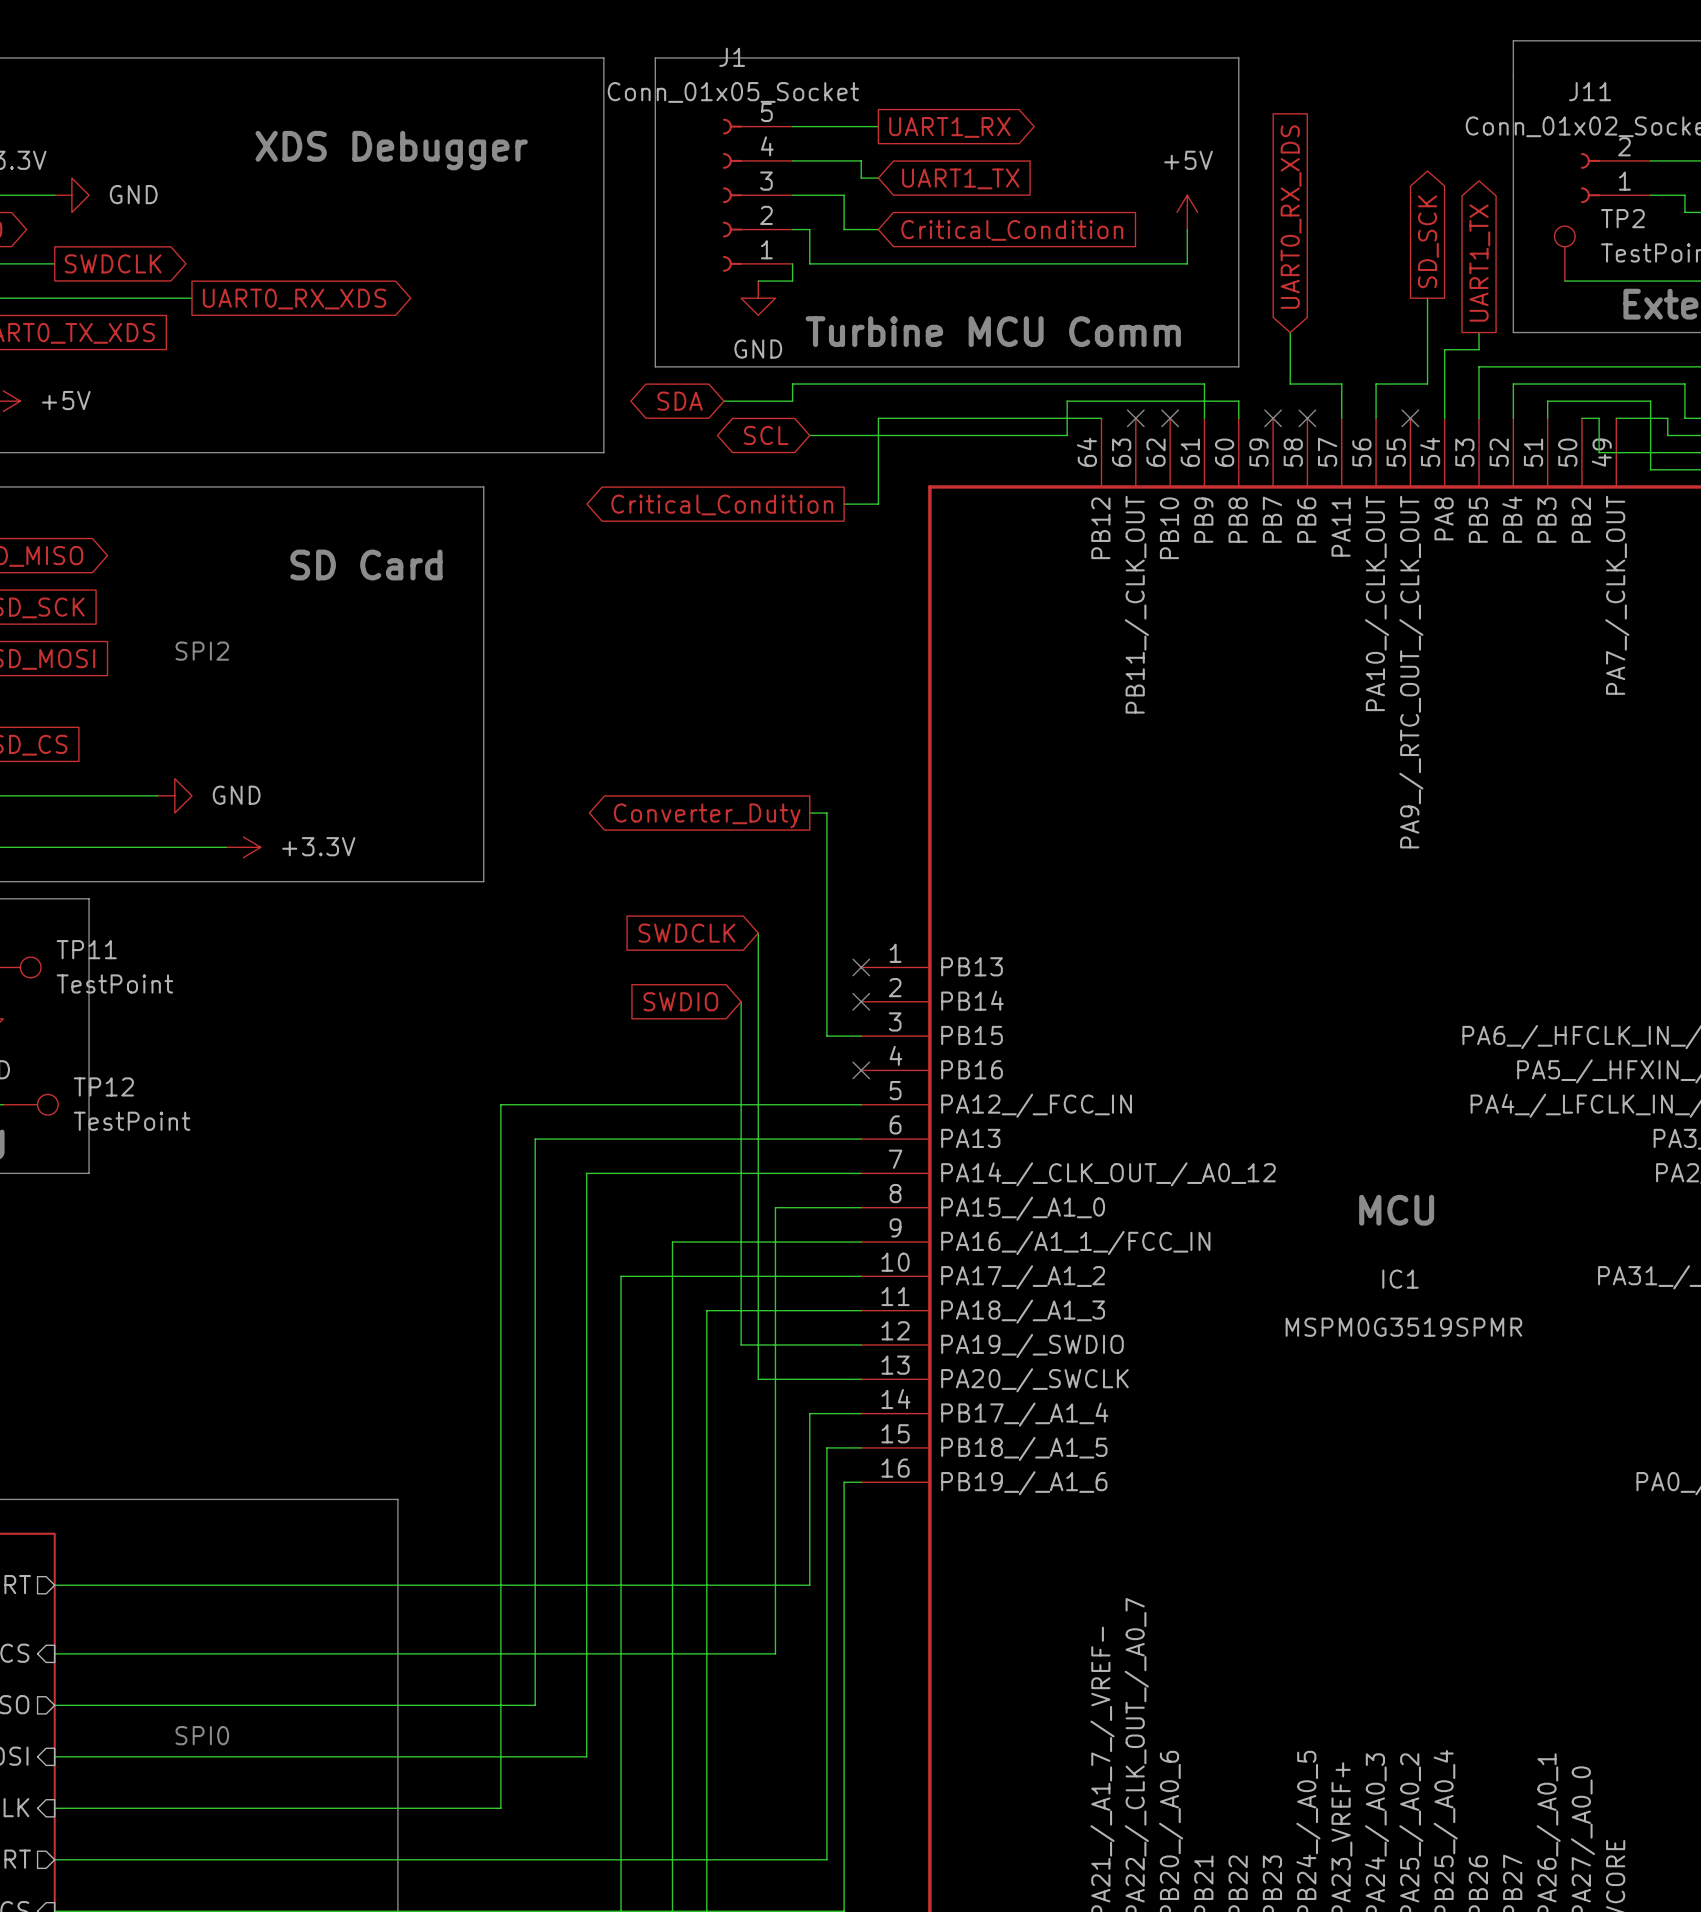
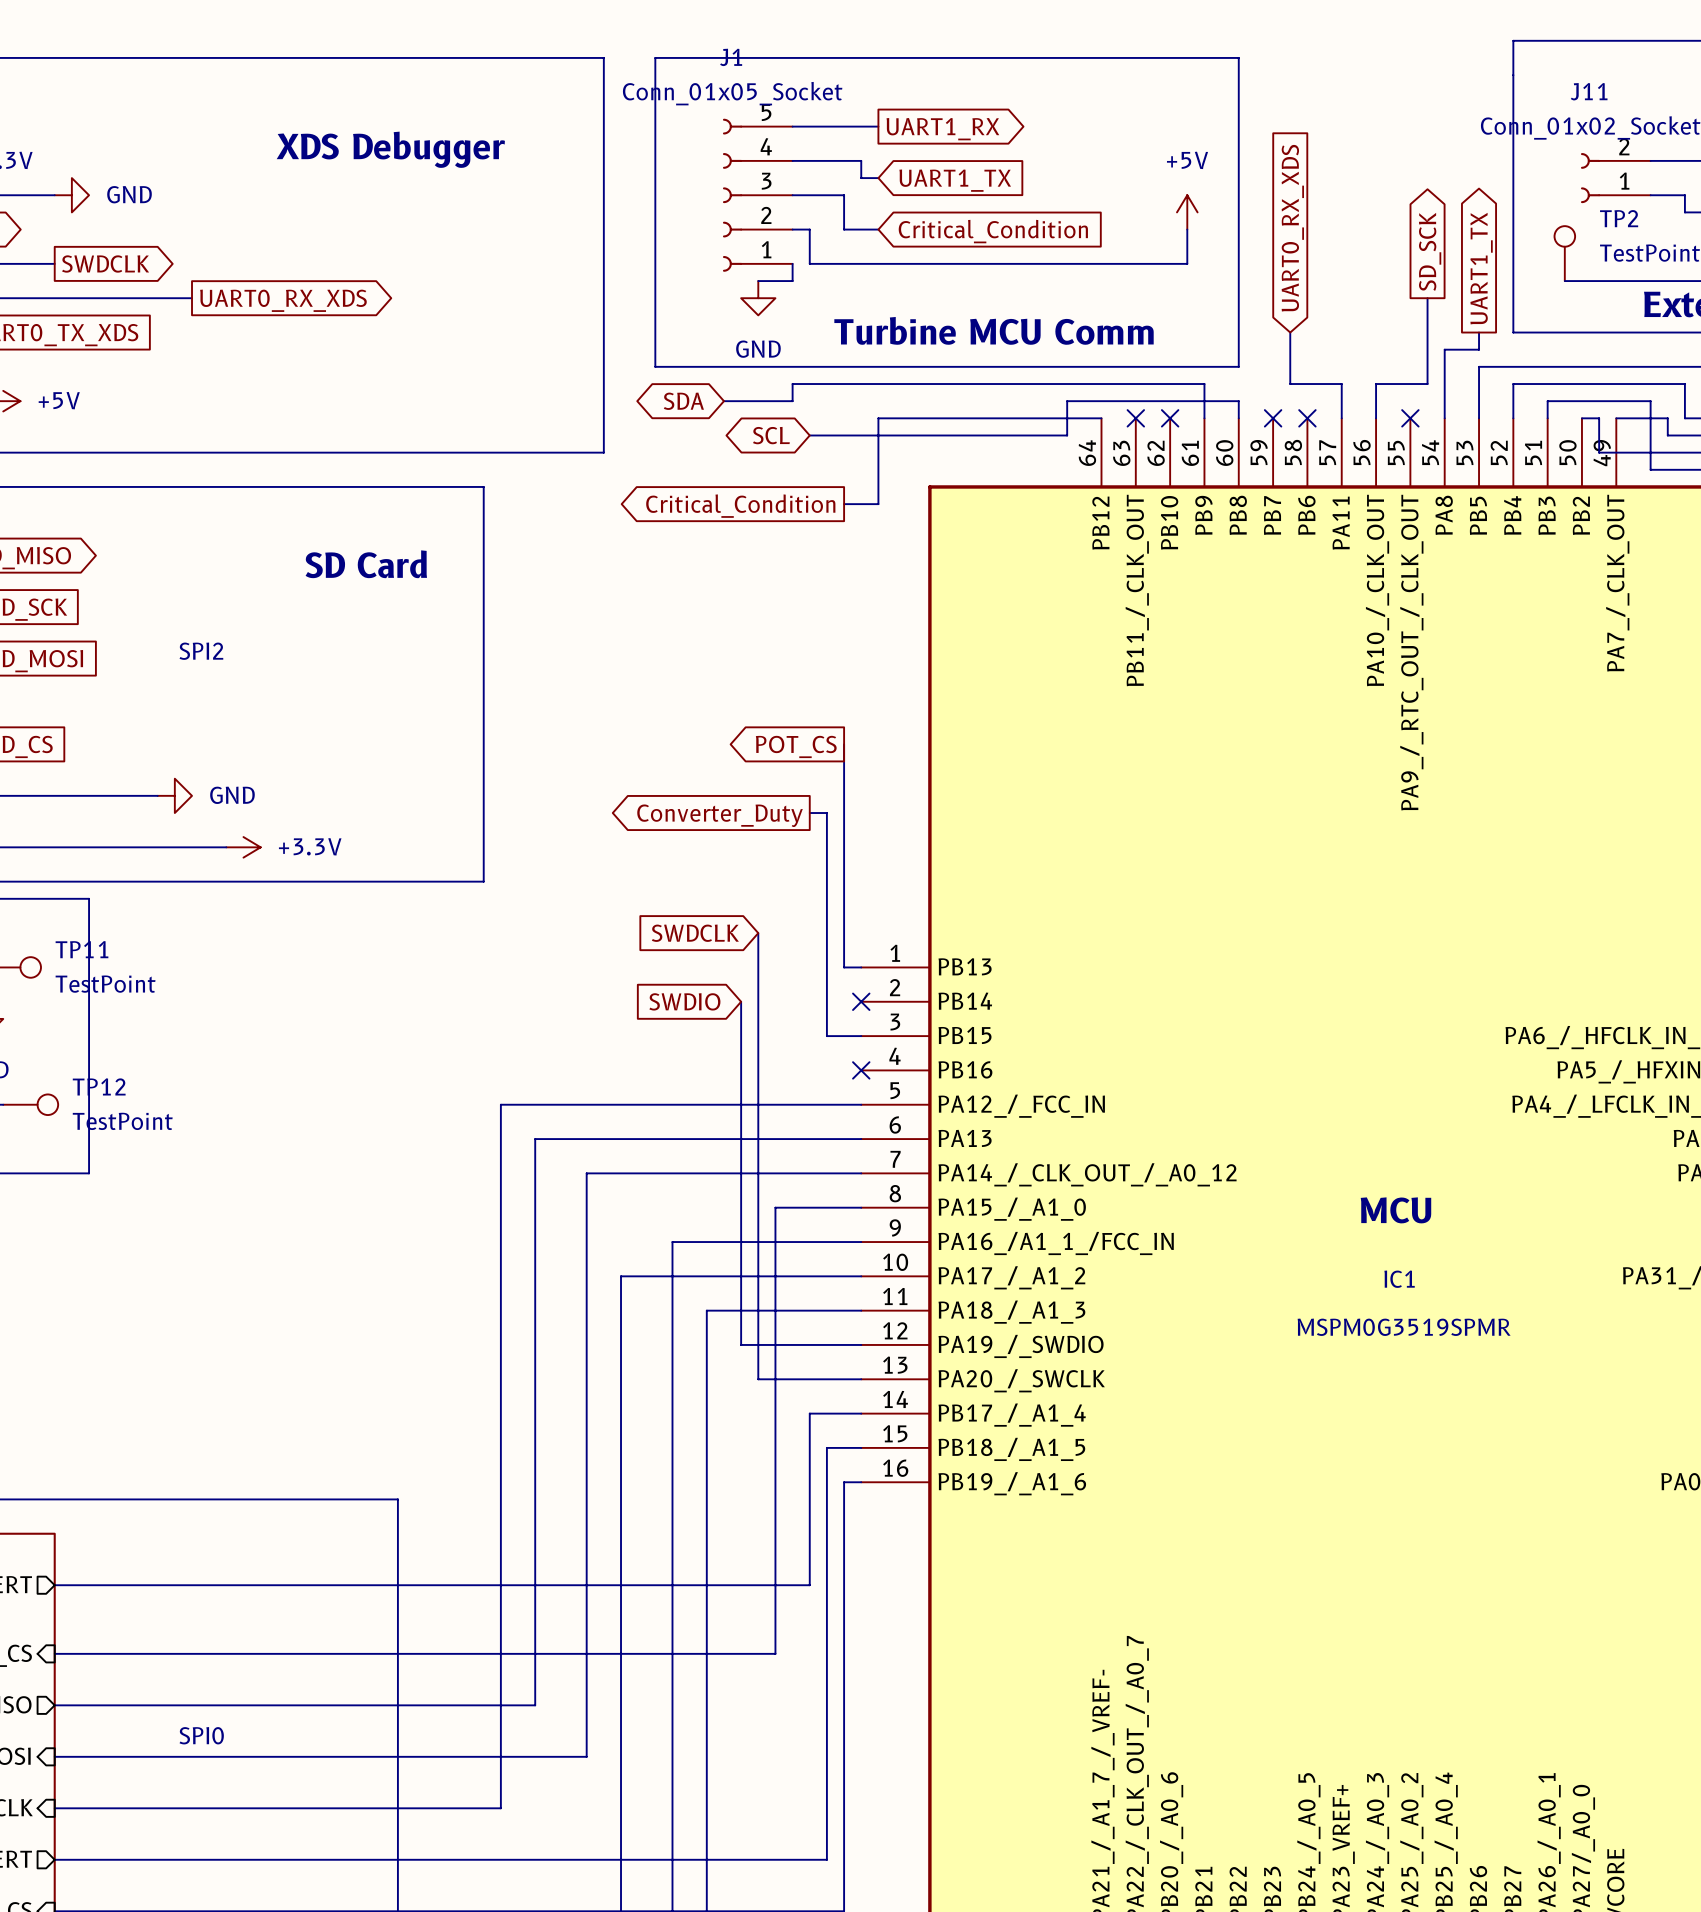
wire: none -> (844, 744) (844, 967) (861, 967)
global label: none -> POT_CS (796, 746)
no-connect mark: (861, 967) -> none

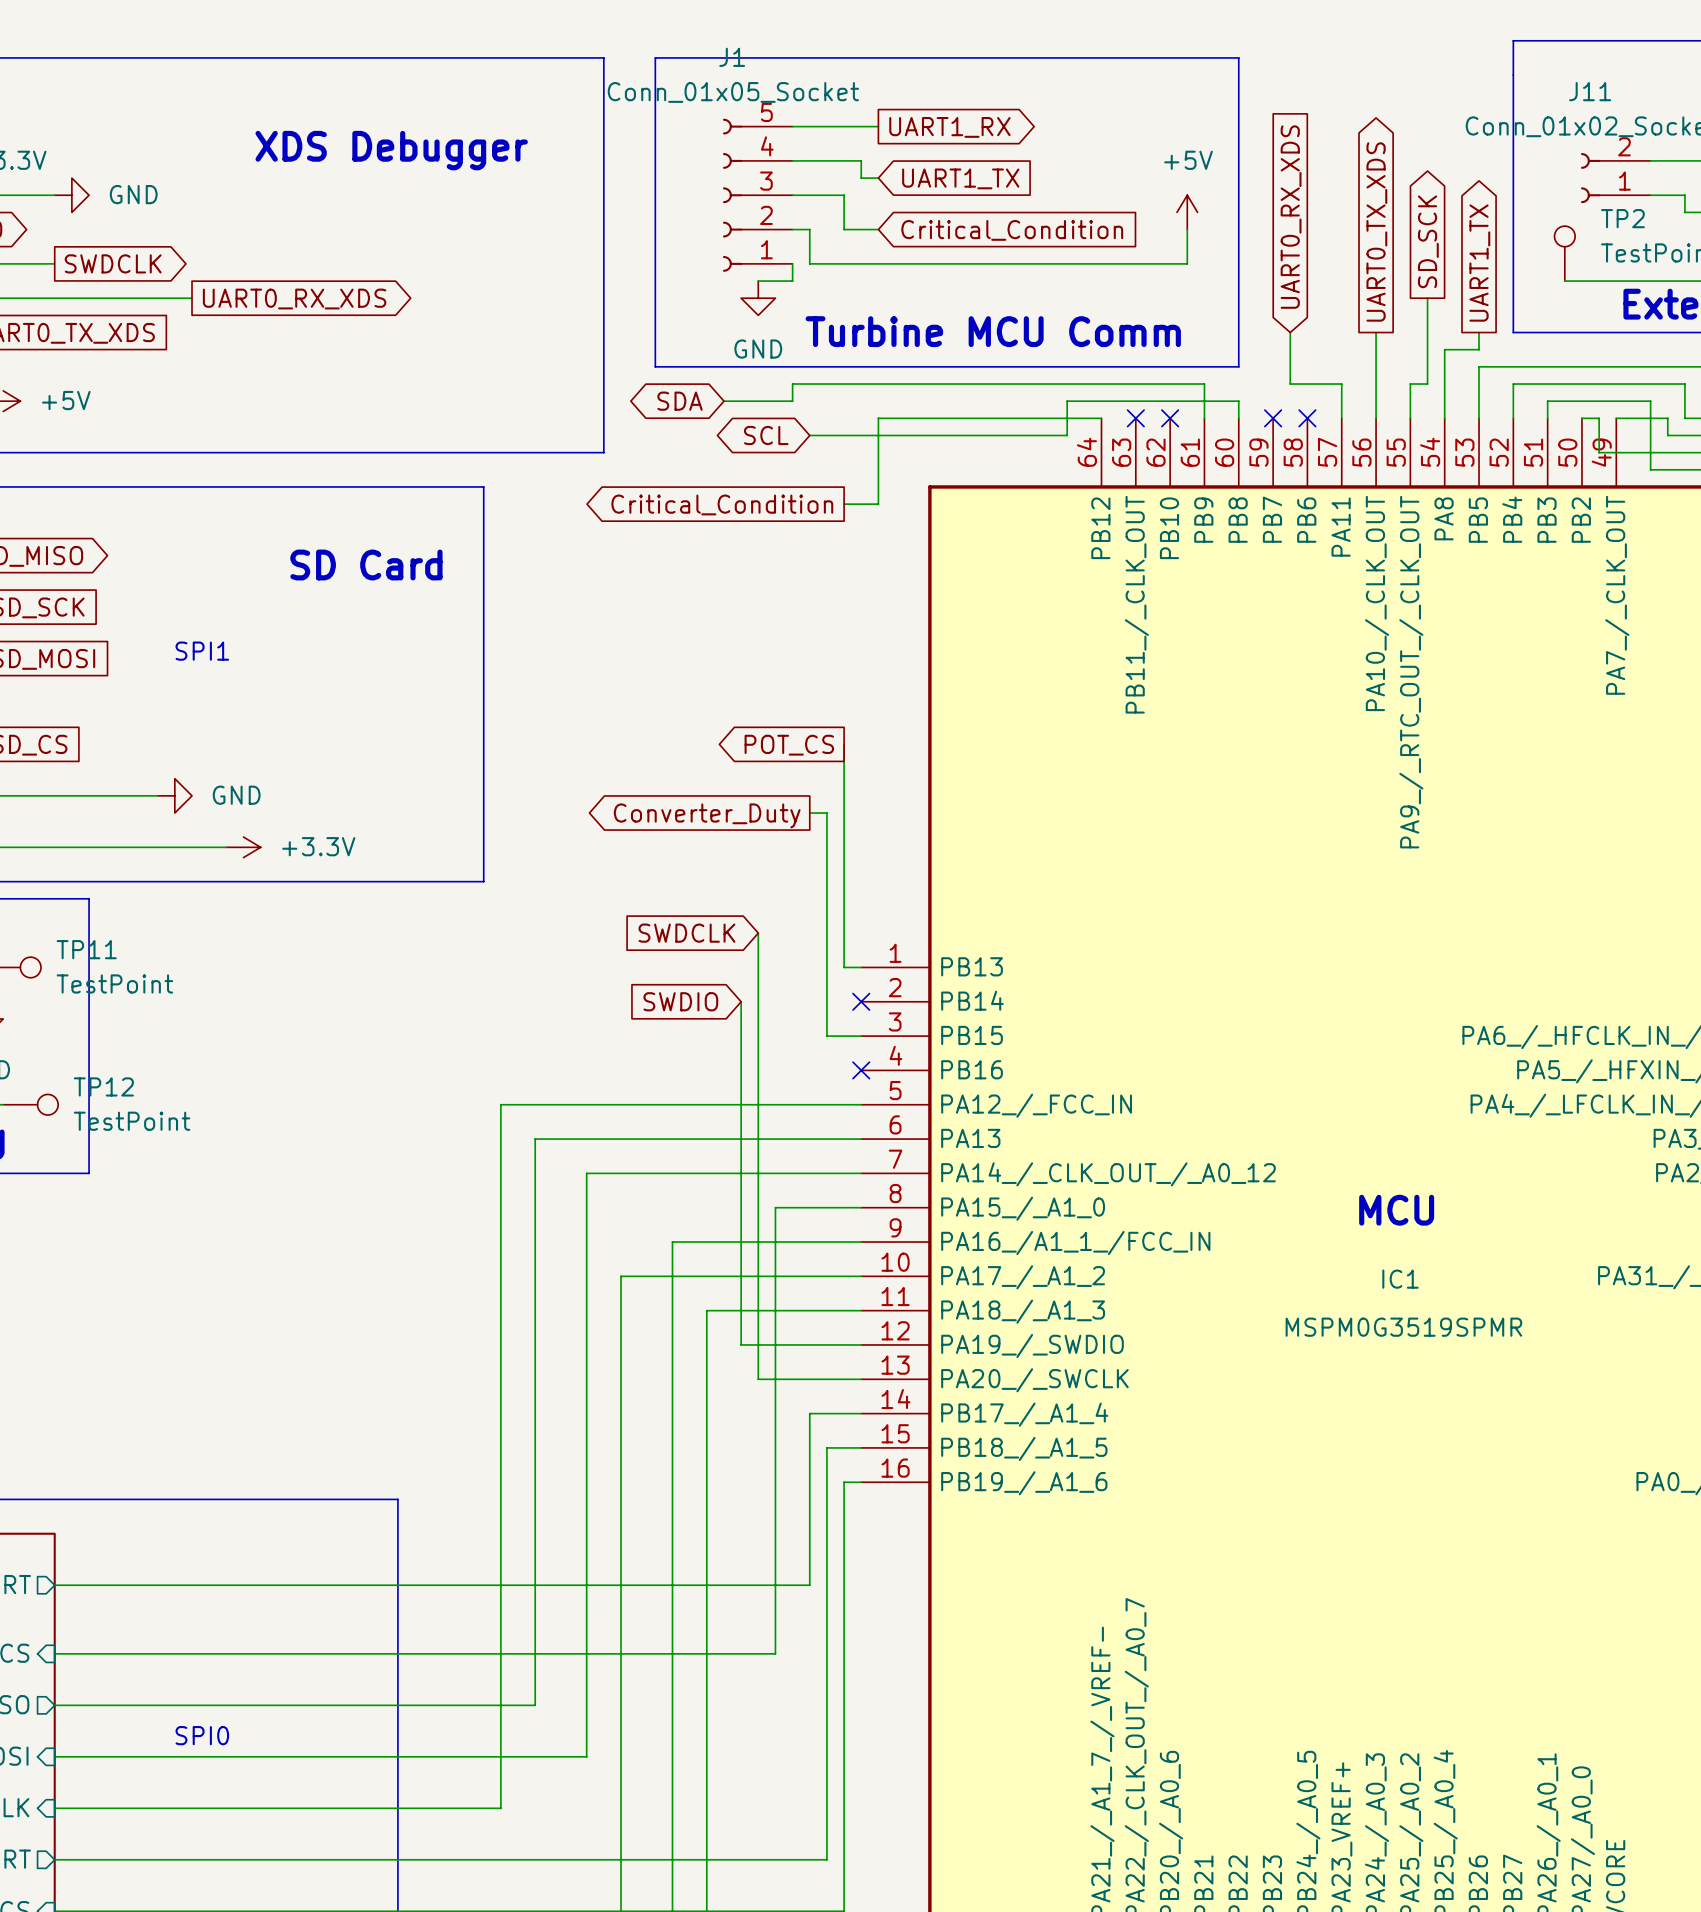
global label: none -> UART0_TX_XDS (1376, 231)
wire: none -> (1376, 332) (1376, 384)
wire: (1376, 384) (1410, 384) -> (1410, 418) (1410, 384)
no-connect mark: (1410, 418) -> none
text: SPI2 (201, 651) -> SPI1 (202, 651)

